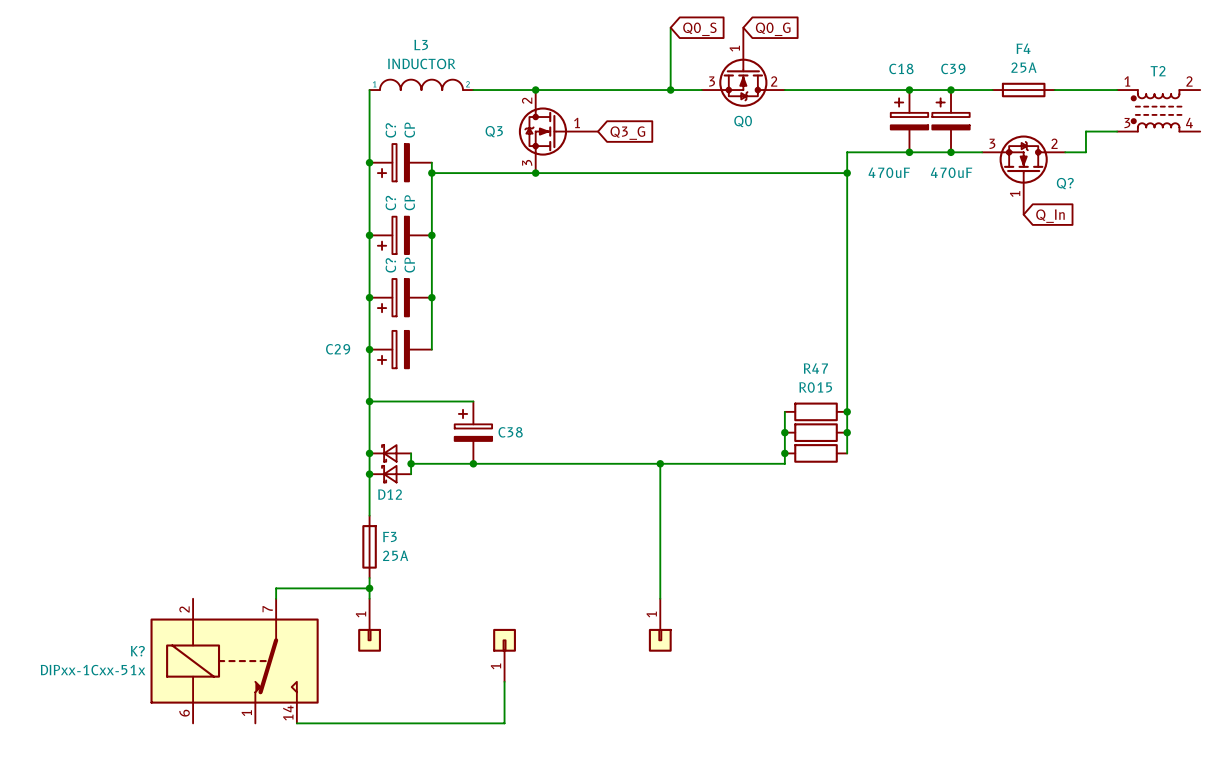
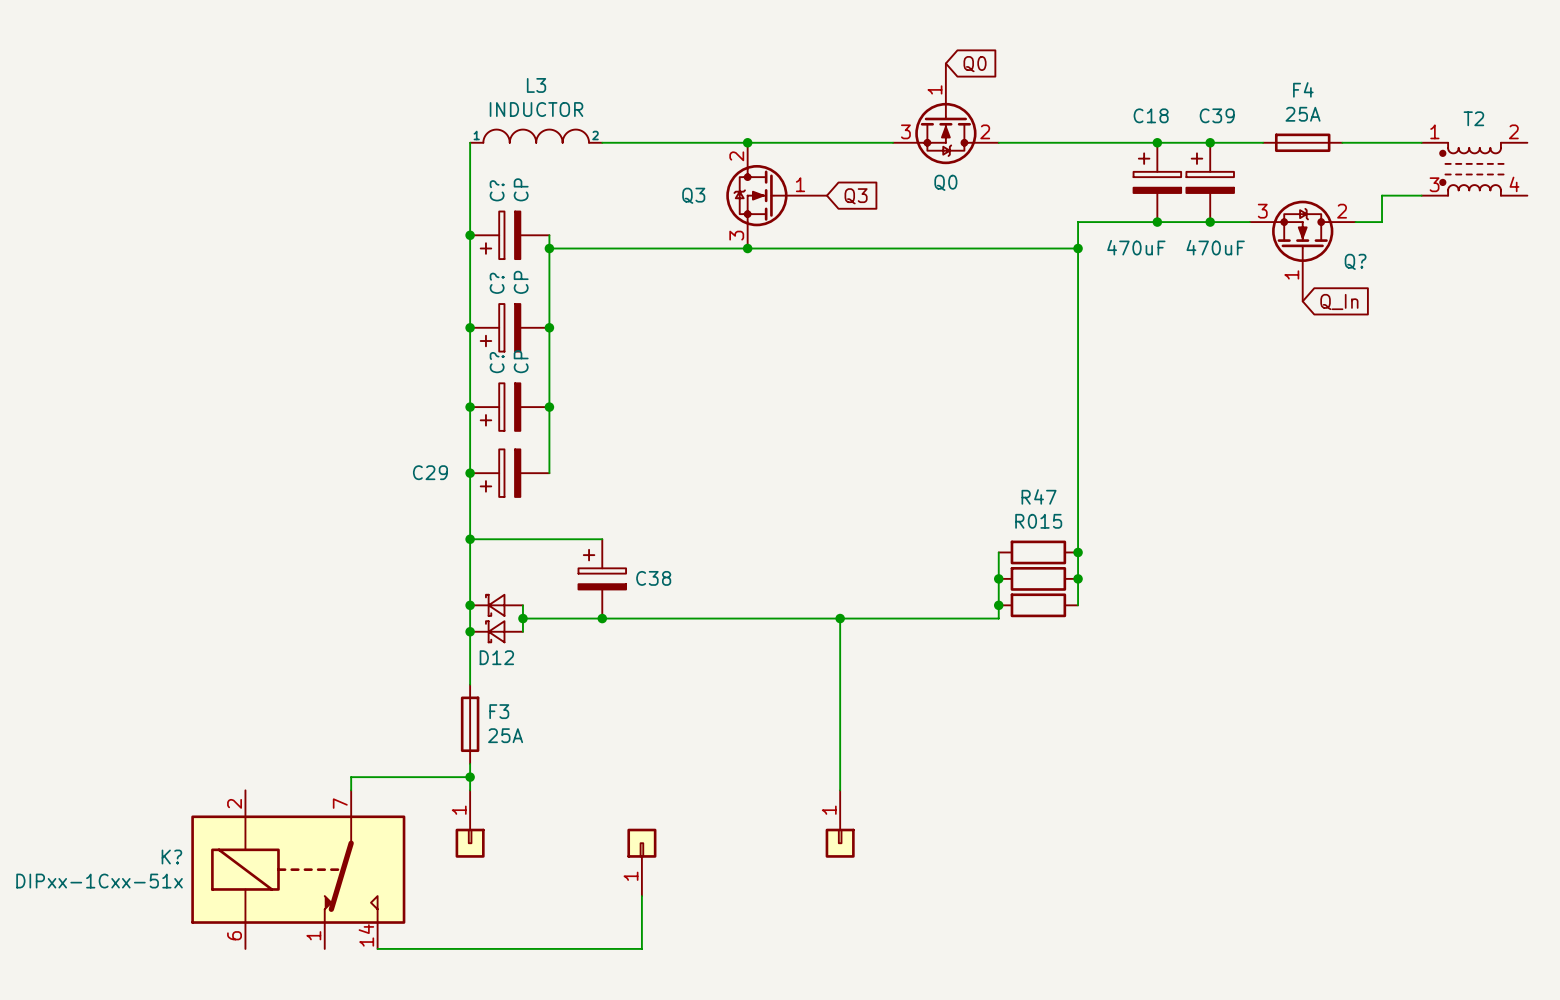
wire: (670, 27) (670, 90) -> none
global label: Q0_S (699, 29) -> none
global label: Q0_G (773, 29) -> Q0 (975, 64)
junction: (535, 90) -> none
junction: none -> (747, 142)
junction: (670, 90) -> none
Q3 position: (558, 131) -> (776, 195)
global label: Q3_G (627, 133) -> Q3 (856, 196)
junction: (535, 173) -> none
junction: none -> (747, 248)

